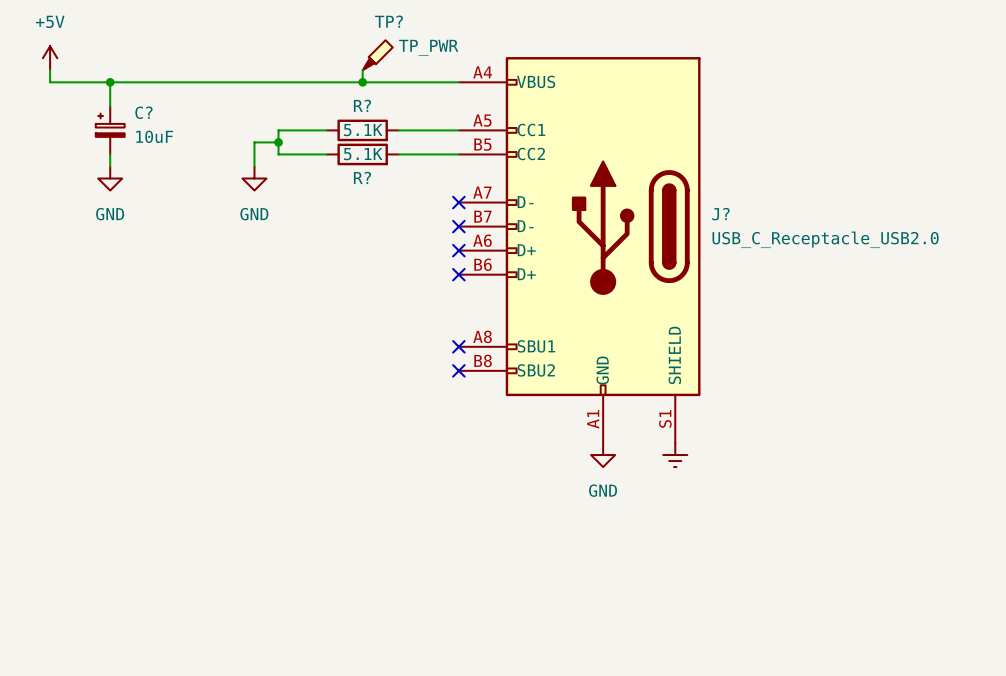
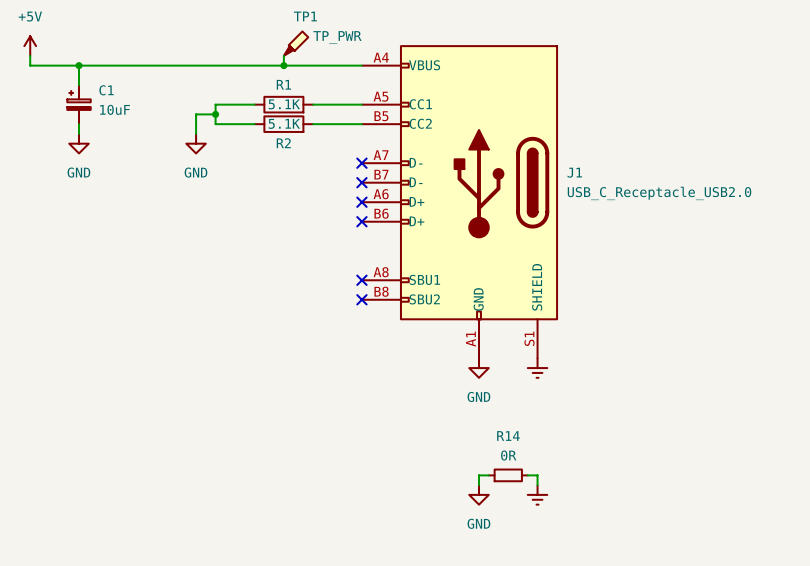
TP? name: TP? (389, 21) -> TP1 (305, 16)
R? name: R? (362, 105) -> R1 (283, 84)
C? name: C? (143, 112) -> C1 (106, 90)
R? name: R? (362, 177) -> R2 (283, 143)
J? name: J? (720, 214) -> J1 (574, 172)
wire: none -> (488, 475) (479, 475) (479, 485)
R14: none -> 0R (508, 475)
wire: none -> (527, 475) (537, 475) (537, 485)
power symbol: none -> GND (479, 494)
power symbol: none -> (537, 494)

